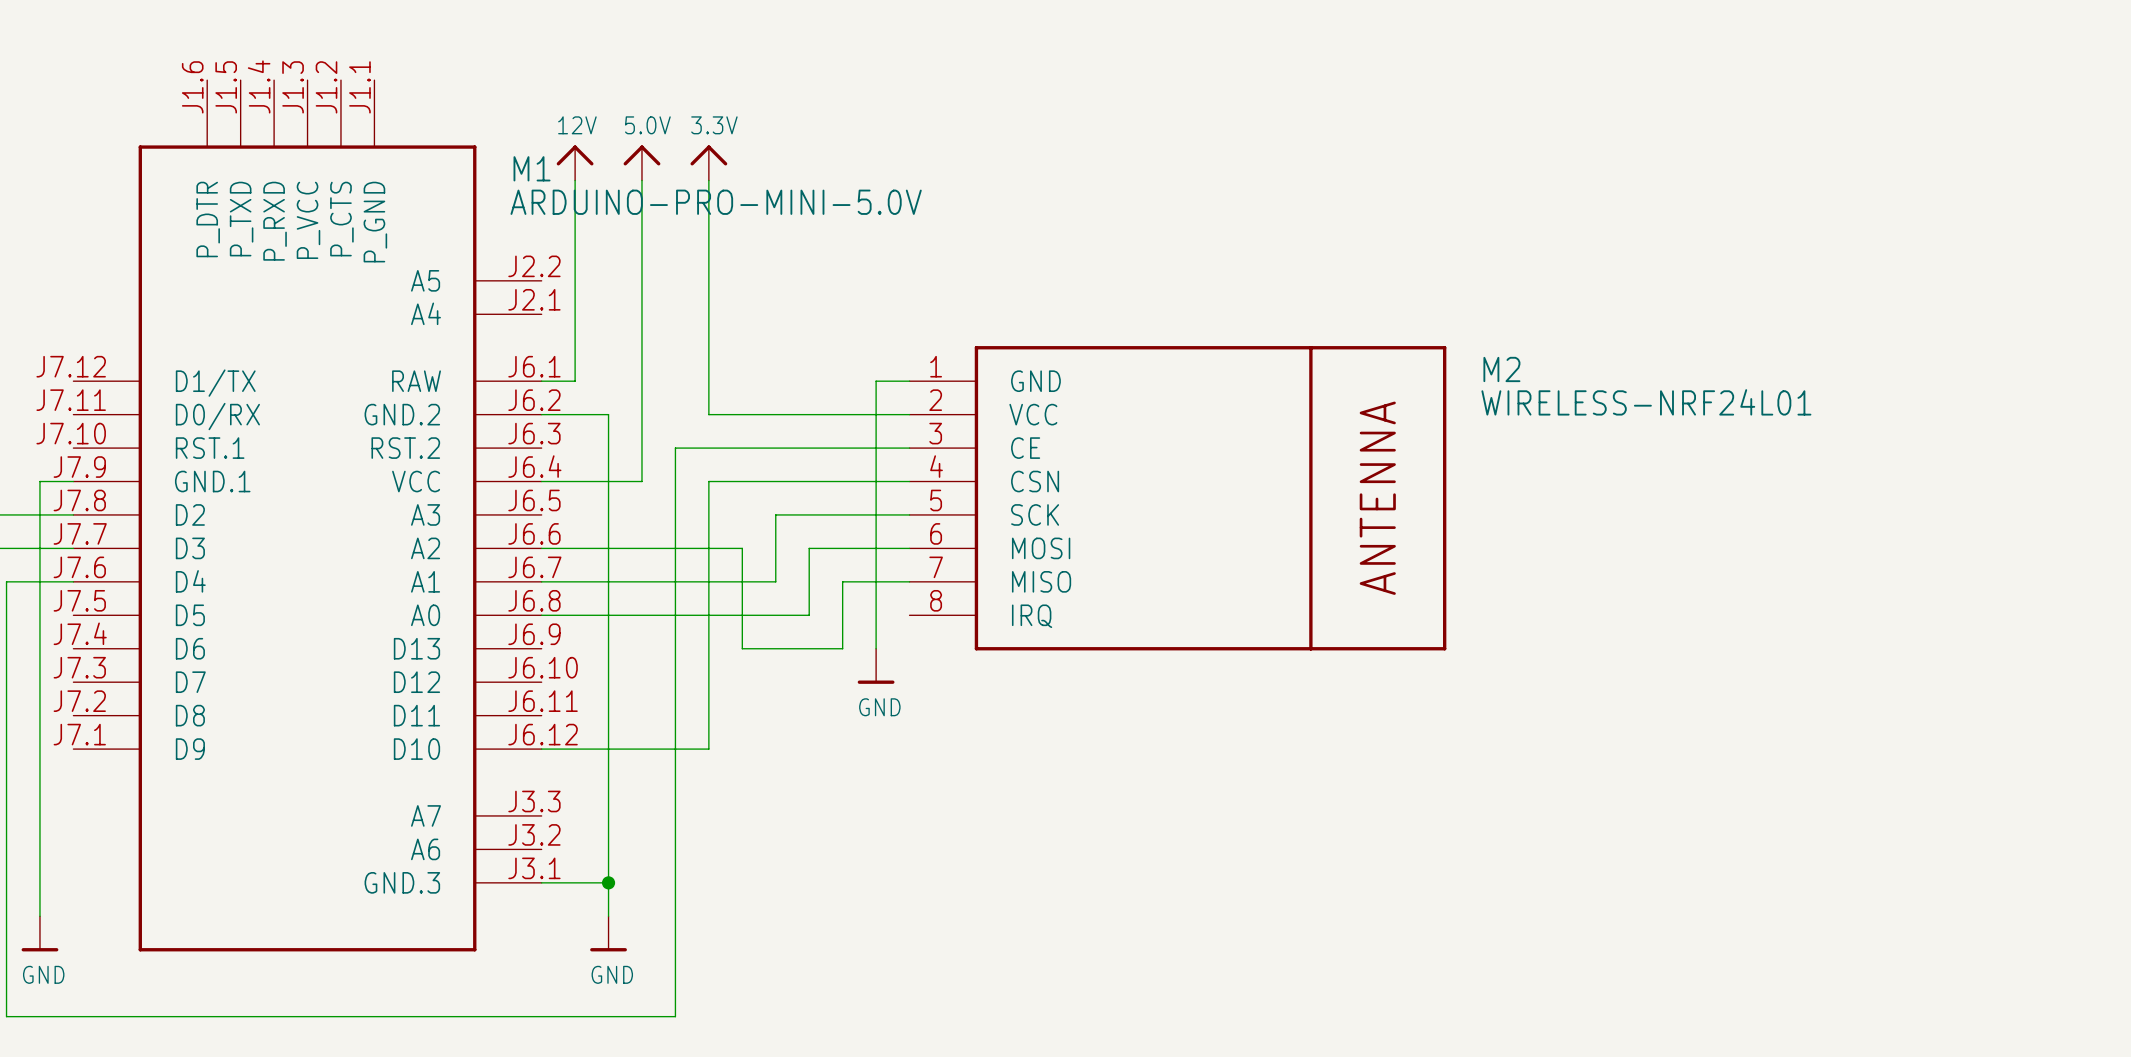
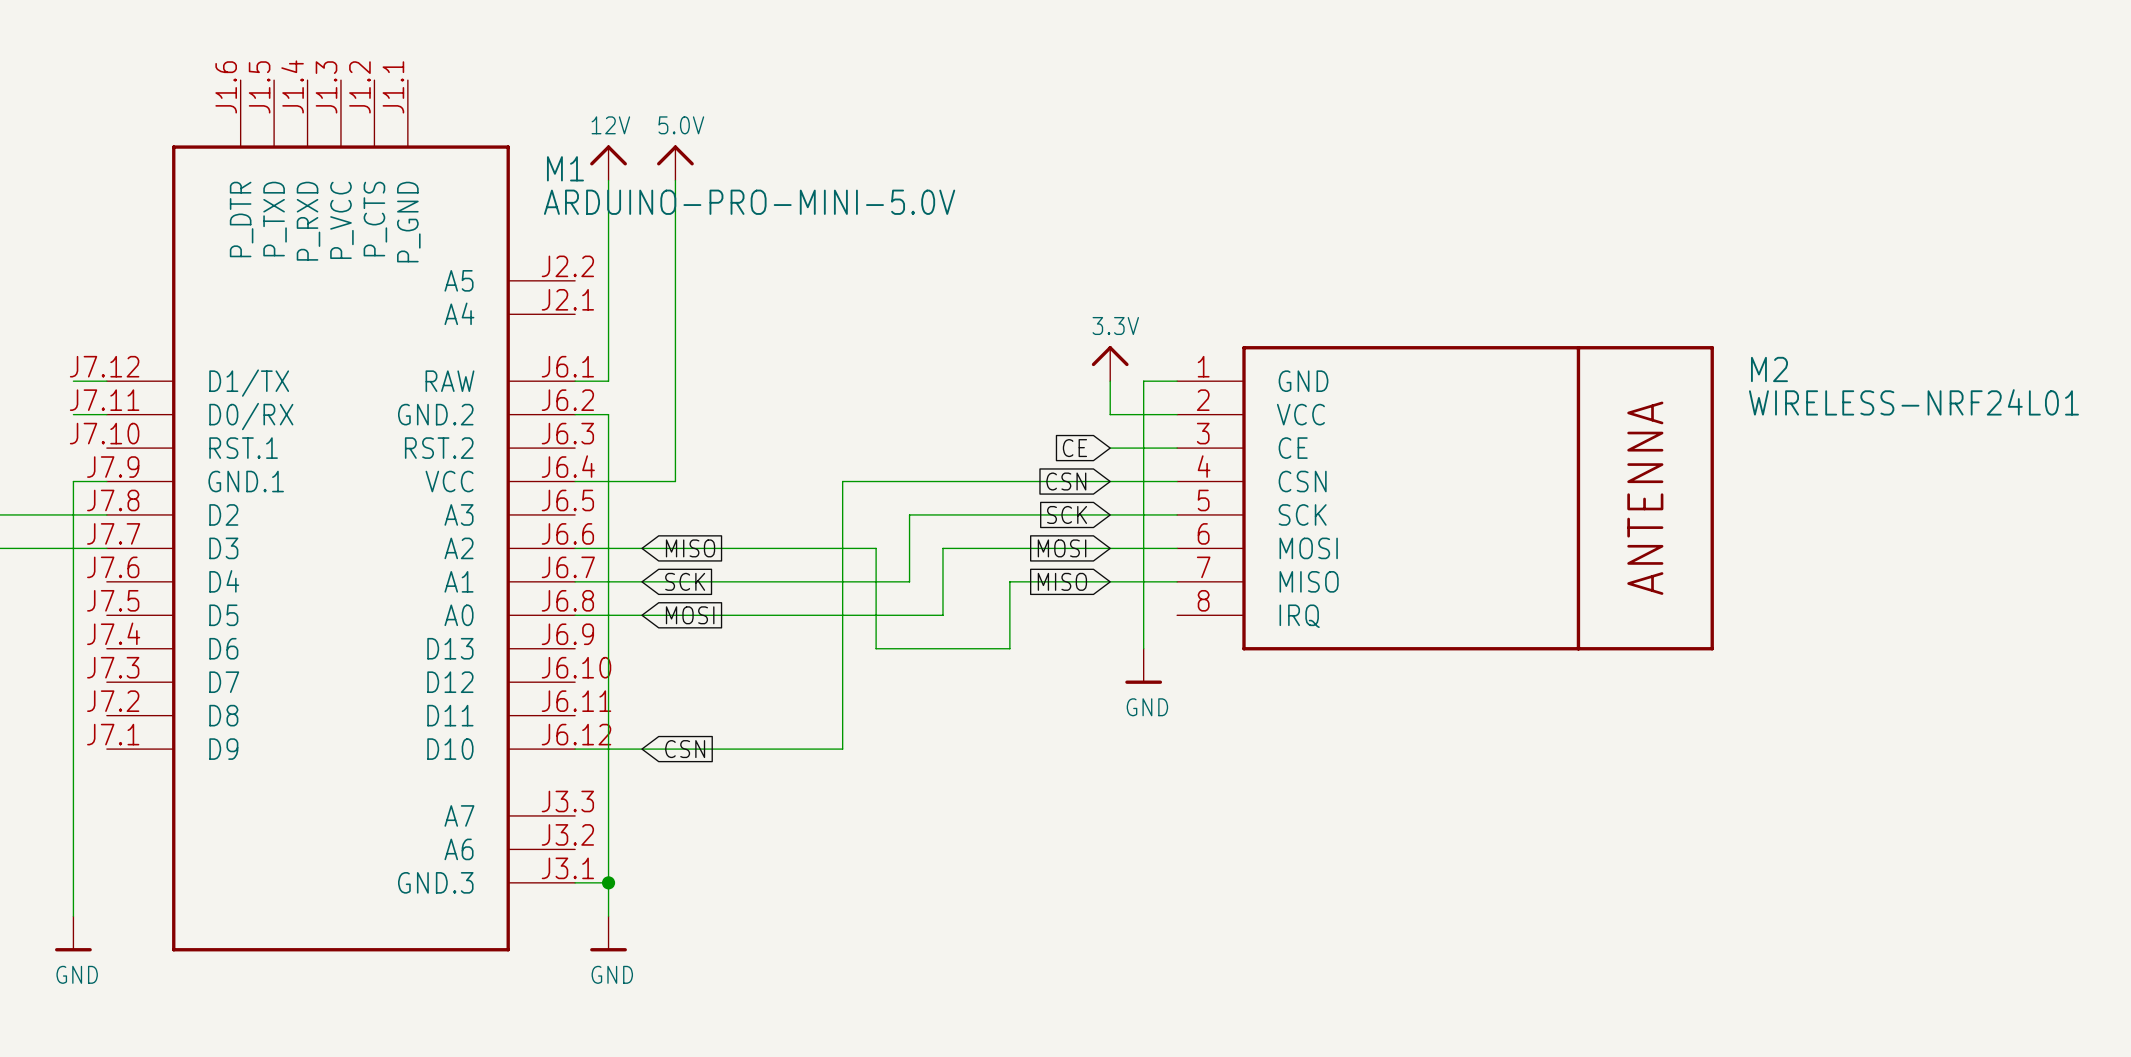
power symbol position: 12V (575, 162) -> 12V (608, 162)
power symbol position: 5.0V (641, 162) -> 5.0V (675, 162)
power symbol: 3.3V (708, 162) -> none
wire: (575, 180) (575, 381) (541, 381) -> (608, 180) (608, 381) (575, 381)
wire: (641, 180) (641, 481) -> (675, 481) (641, 481)
wire: (708, 180) (708, 414) (909, 414) -> none
power symbol: none -> 3.3V (1110, 363)
wire: (909, 381) (876, 381) (876, 548) (909, 548) -> none
wire: none -> (1110, 381) (1110, 414) (1177, 414)
wire: none -> (1177, 381) (1143, 381) (1143, 648)
wire: (675, 448) (909, 448) -> (675, 448) (675, 180)
global label: none -> CE (1074, 448)
wire: none -> (1110, 448) (1177, 448)
wire: (73, 481) (39, 481) (39, 916) -> (106, 481) (73, 481) (73, 916)
wire: (675, 481) (675, 1016) (6, 1016) (6, 581) (73, 581) -> none
wire: (842, 481) (708, 481) (708, 749) -> (842, 648) (842, 749) (708, 749)
wire: none -> (909, 481) (1177, 481)
global label: none -> CSN (1066, 481)
M2 position: (1177, 498) -> (1445, 498)
wire: (909, 514) (775, 514) (775, 581) -> (842, 481) (842, 581) (775, 581)
global label: none -> SCK (1067, 514)
wire: none -> (1177, 514) (909, 514) (909, 581)
M1 position: (307, 515) -> (340, 515)
global label: none -> MISO (690, 548)
wire: (742, 548) (742, 648) (842, 648) -> none
wire: (809, 548) (809, 615) -> (809, 548) (742, 548)
global label: none -> MOSI (1062, 548)
wire: none -> (1177, 548) (942, 548) (942, 615) (809, 615)
global label: none -> SCK (685, 581)
global label: none -> MISO (1062, 581)
wire: none -> (1177, 581) (1009, 581) (1009, 648) (876, 648)
global label: none -> MOSI (690, 615)
power symbol position: GND (876, 666) -> GND (1143, 666)
global label: none -> CSN (685, 749)
power symbol position: GND (39, 933) -> GND (73, 933)

